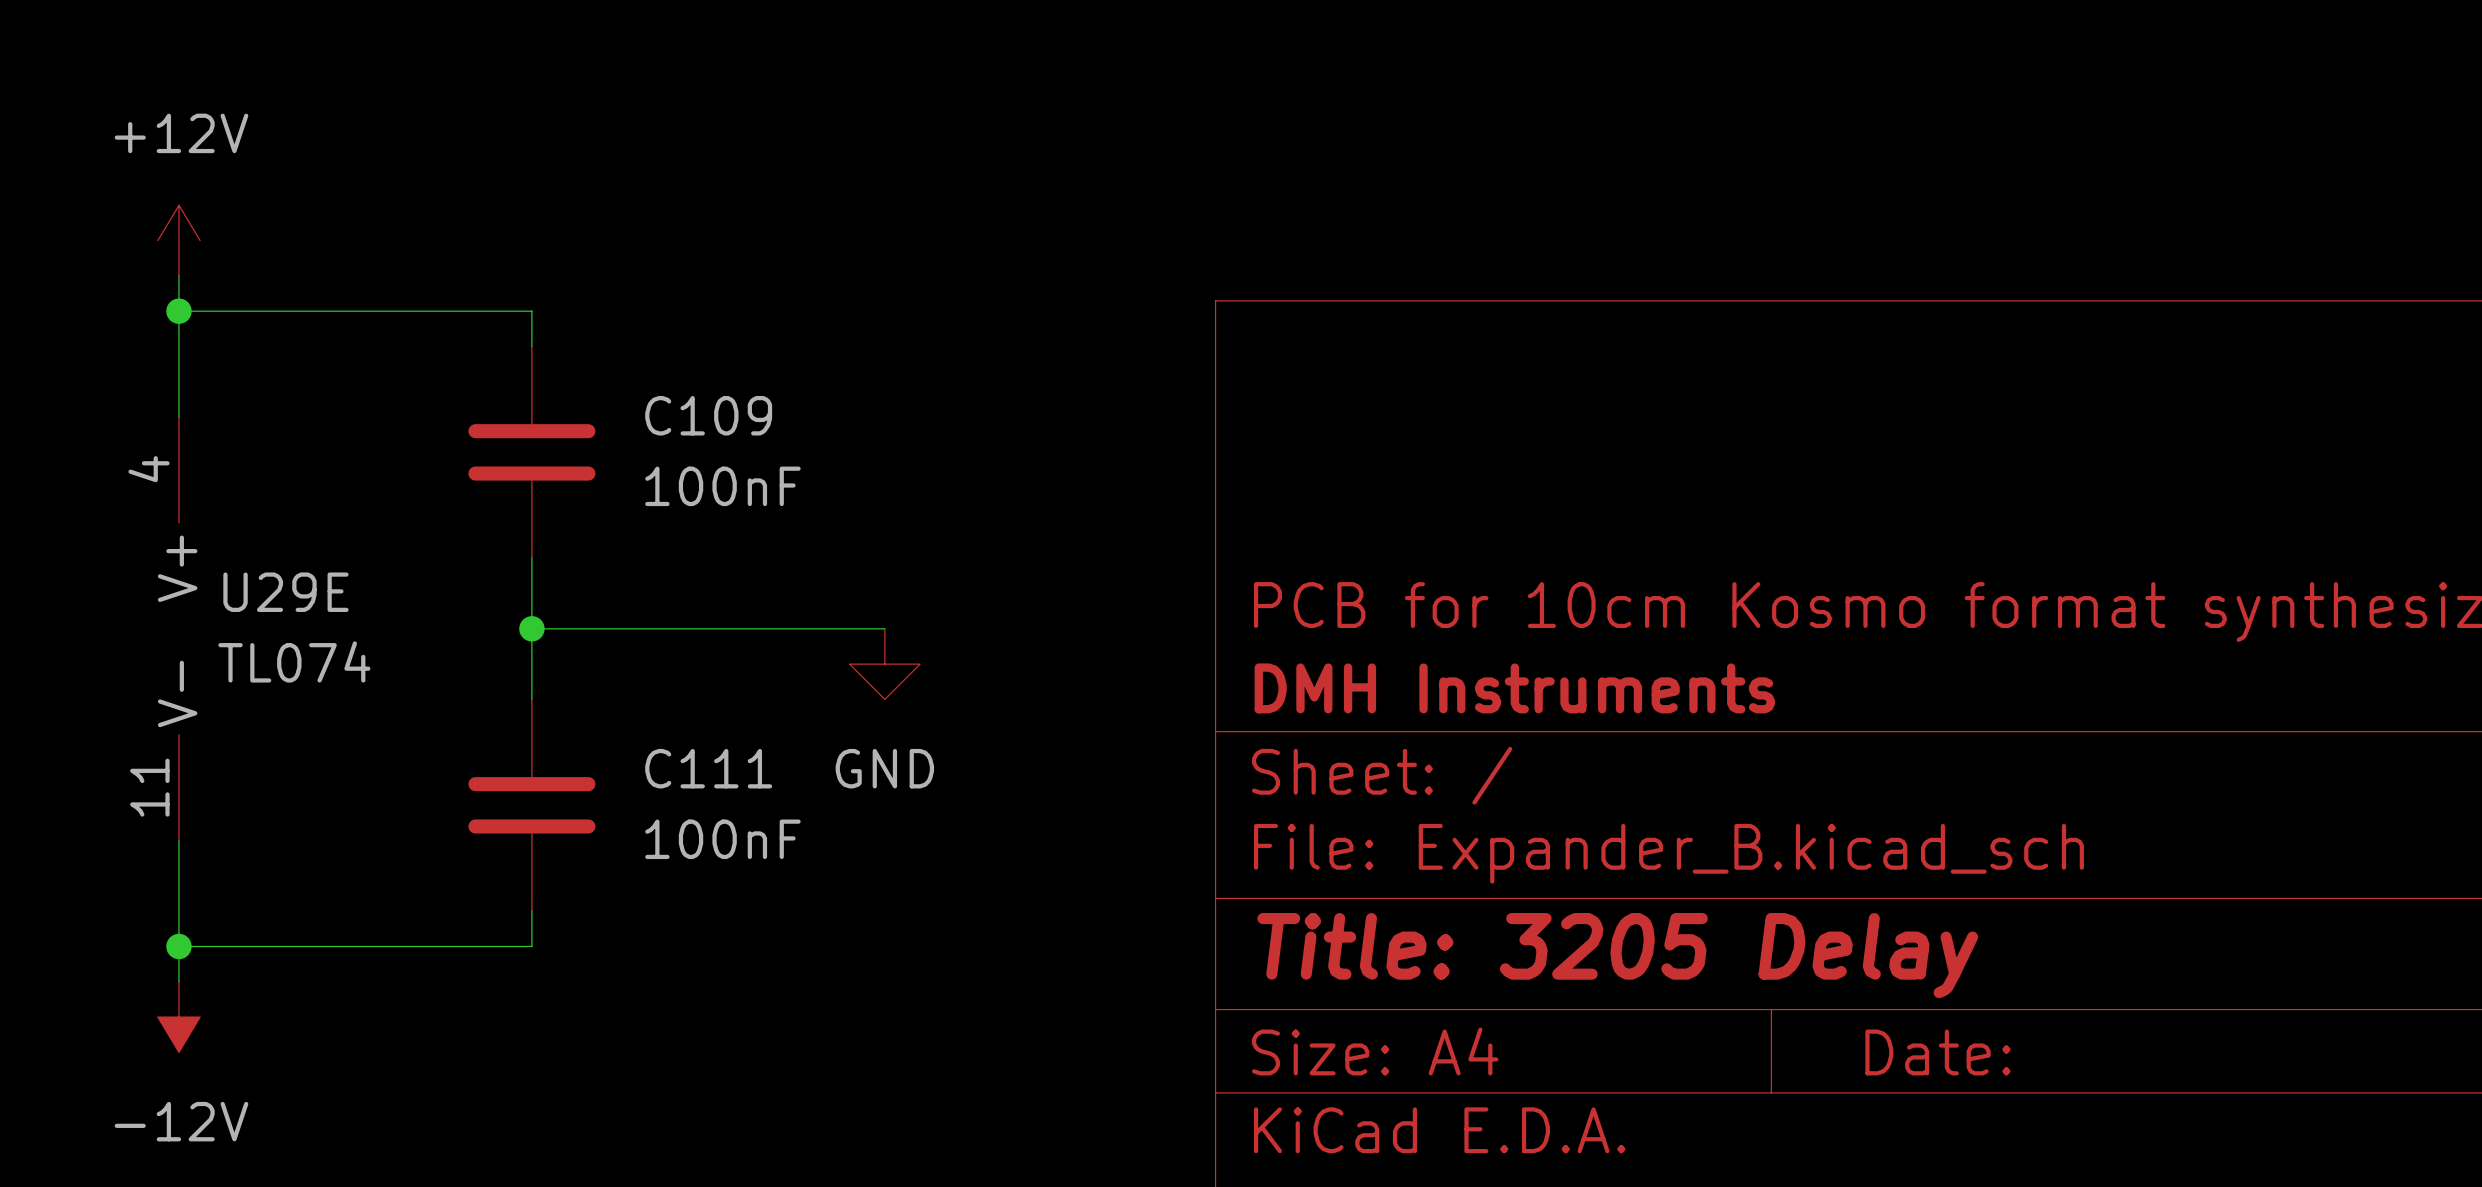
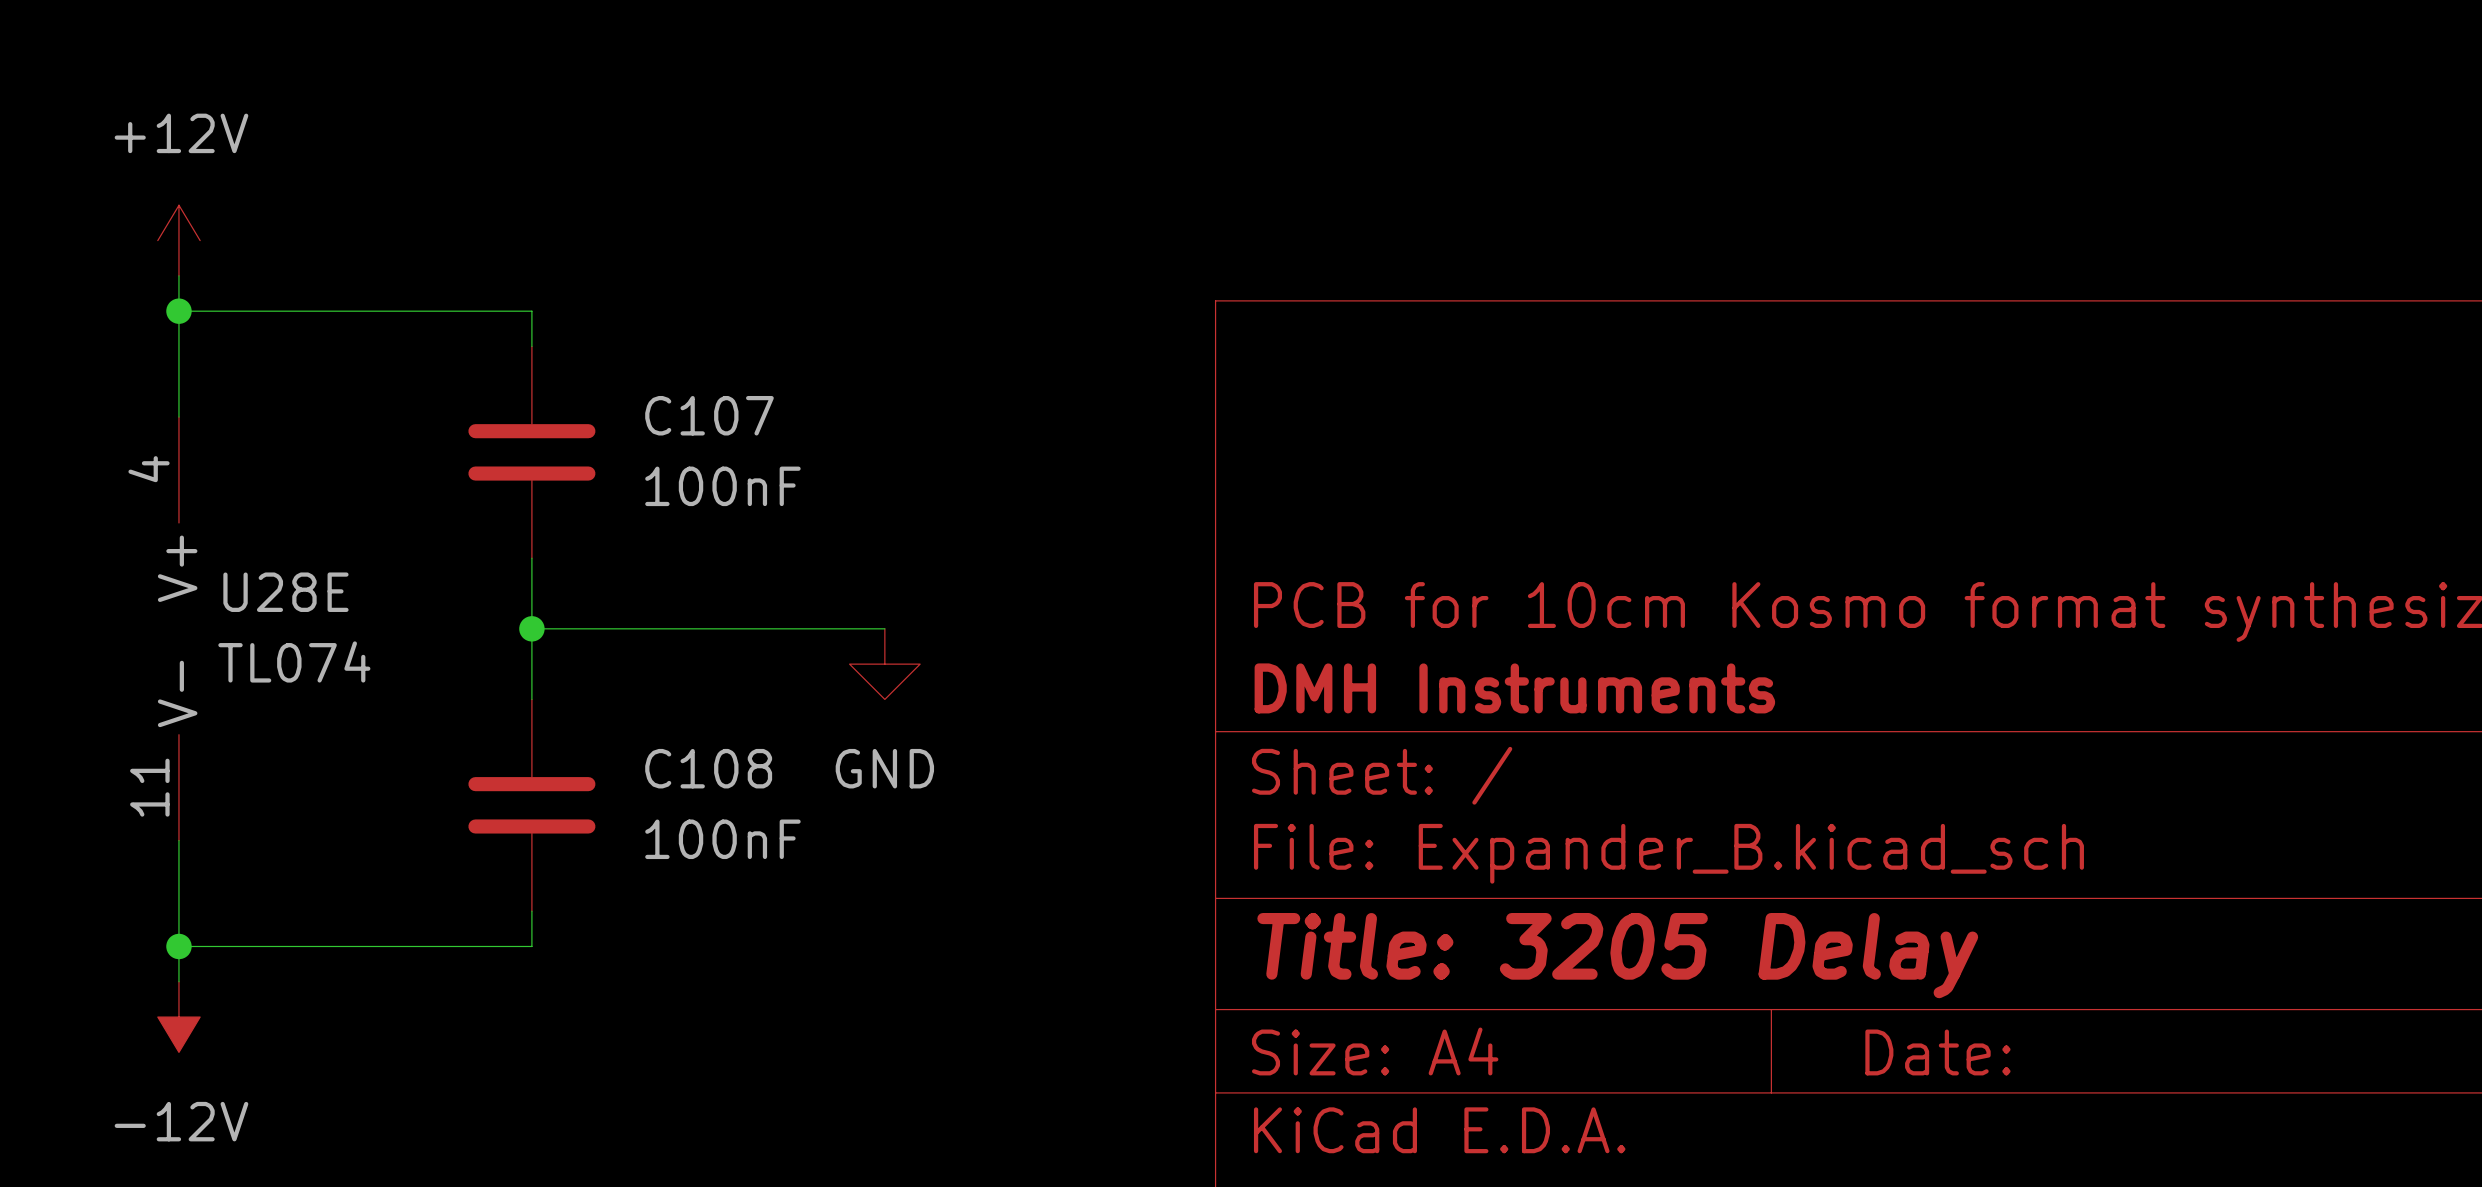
C109 name: C109 (708, 415) -> C107 (709, 415)
U29E name: U29E (285, 592) -> U28E (285, 592)
C111 name: C111 (708, 768) -> C108 (708, 768)

